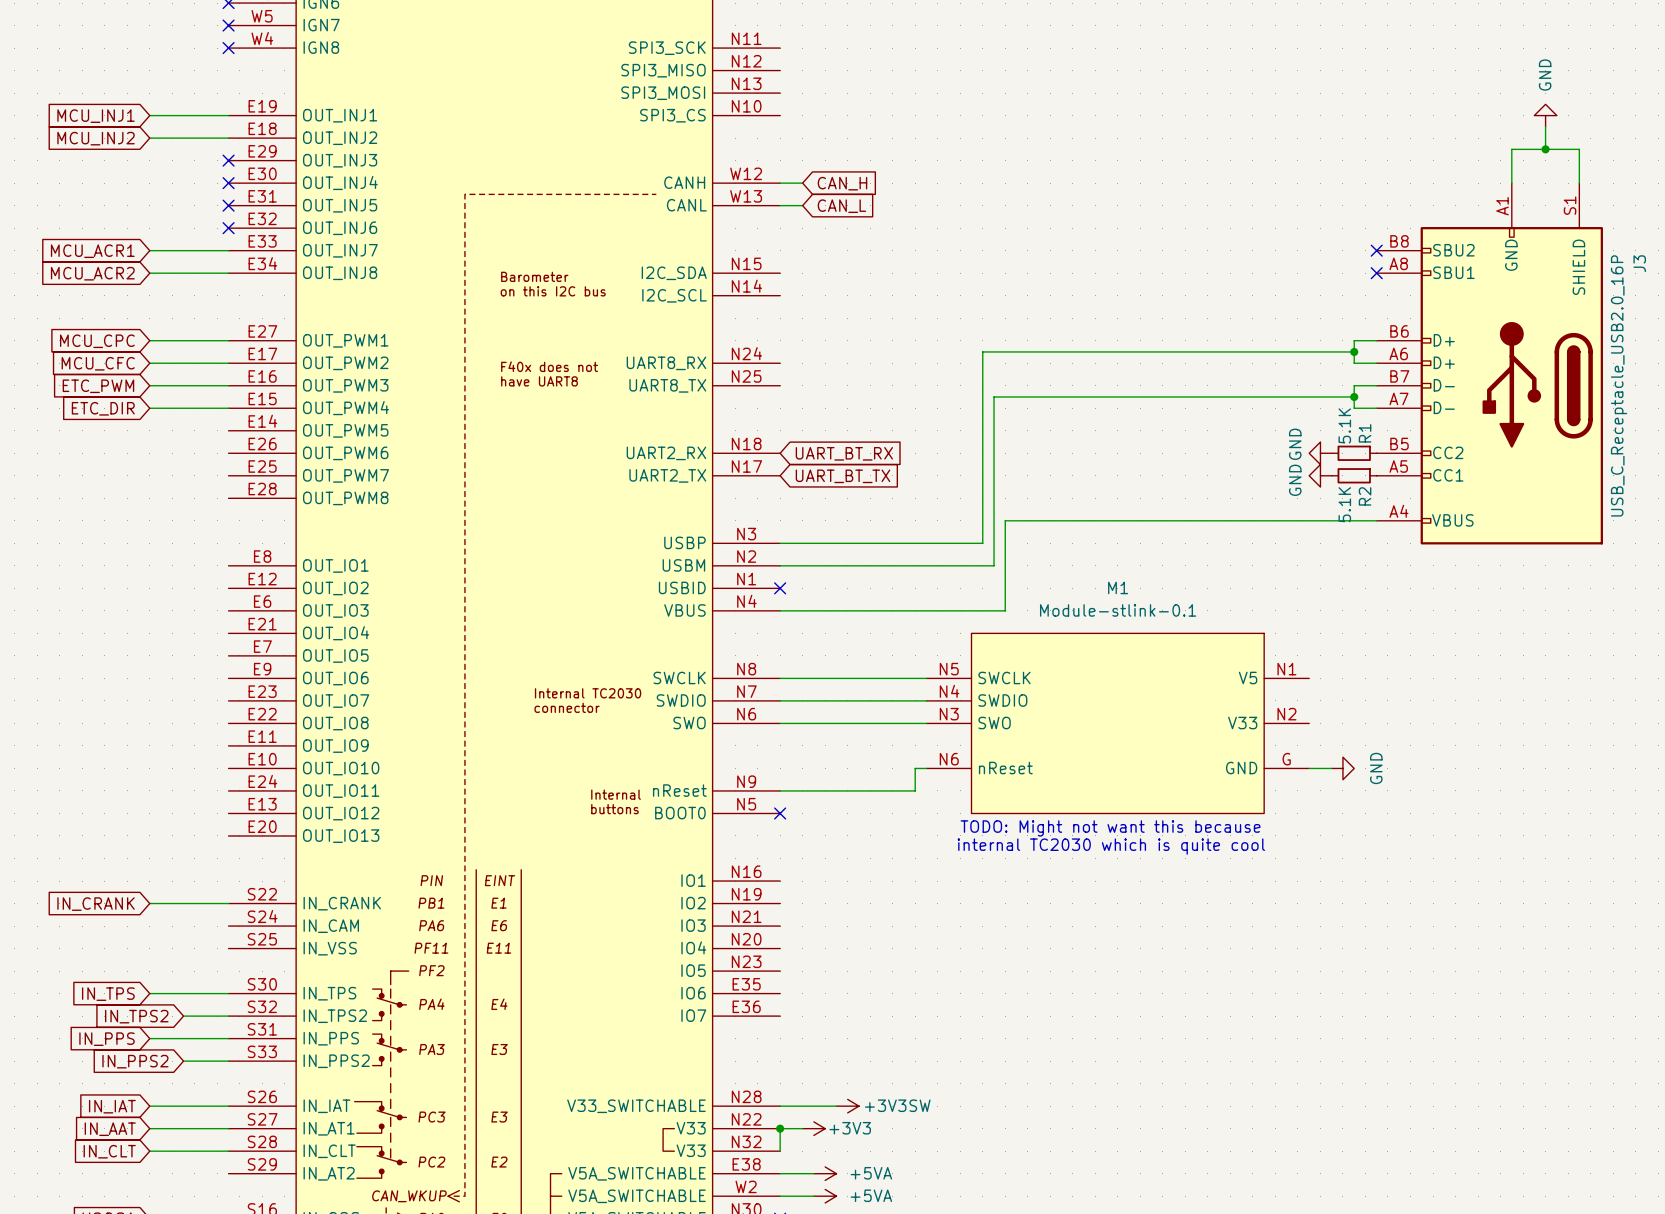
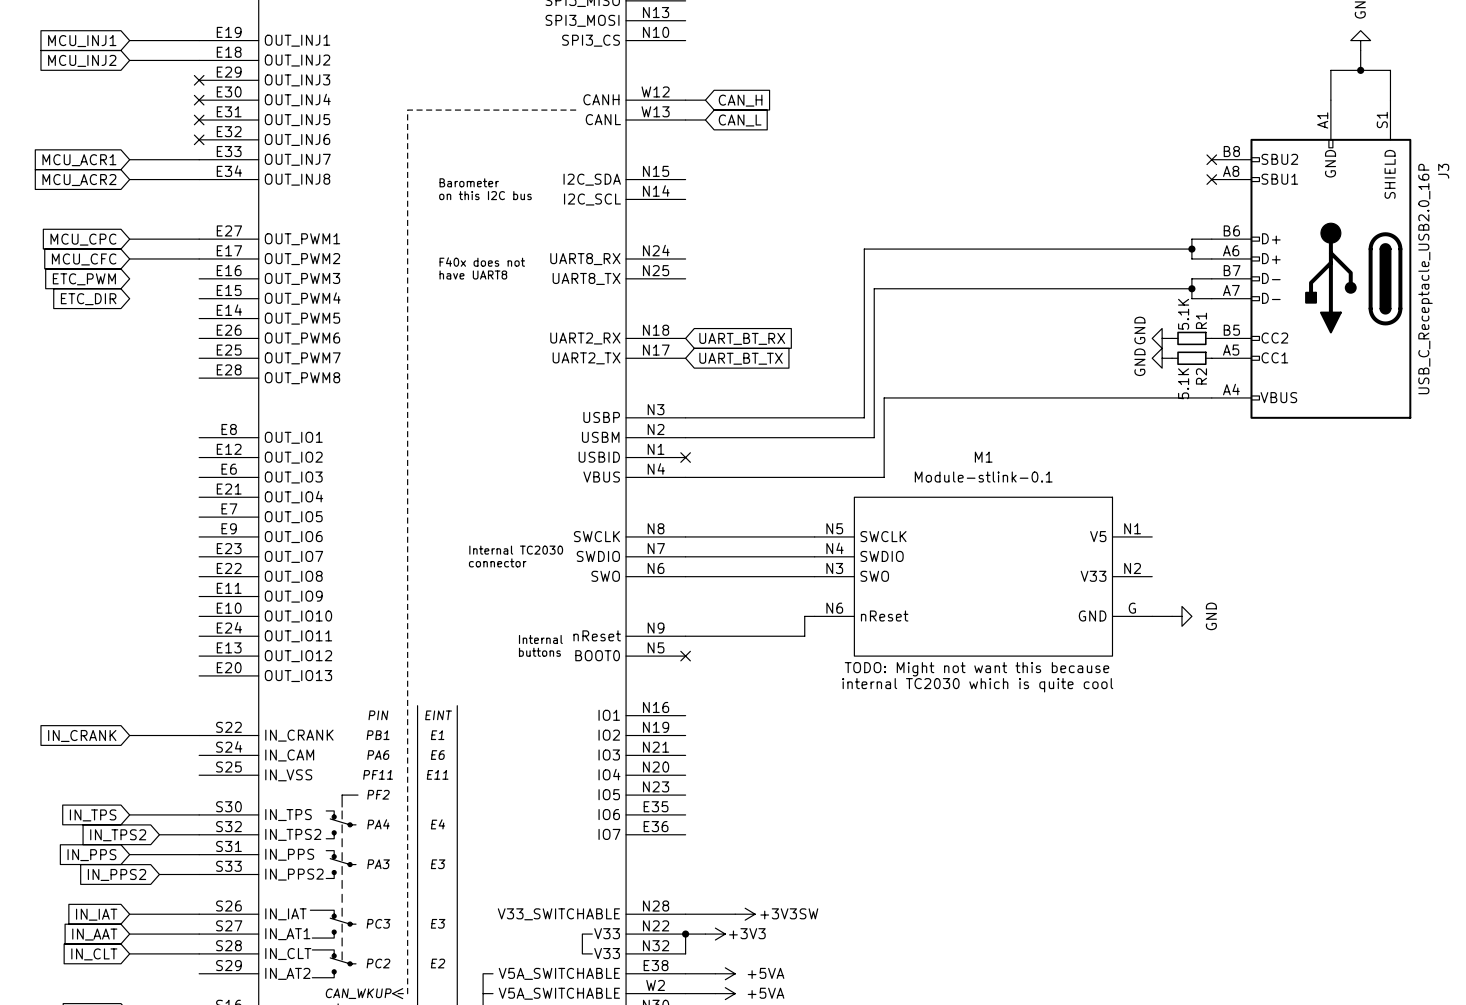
wire: (149, 385) (228, 385) -> none
wire: (149, 408) (228, 408) -> none

